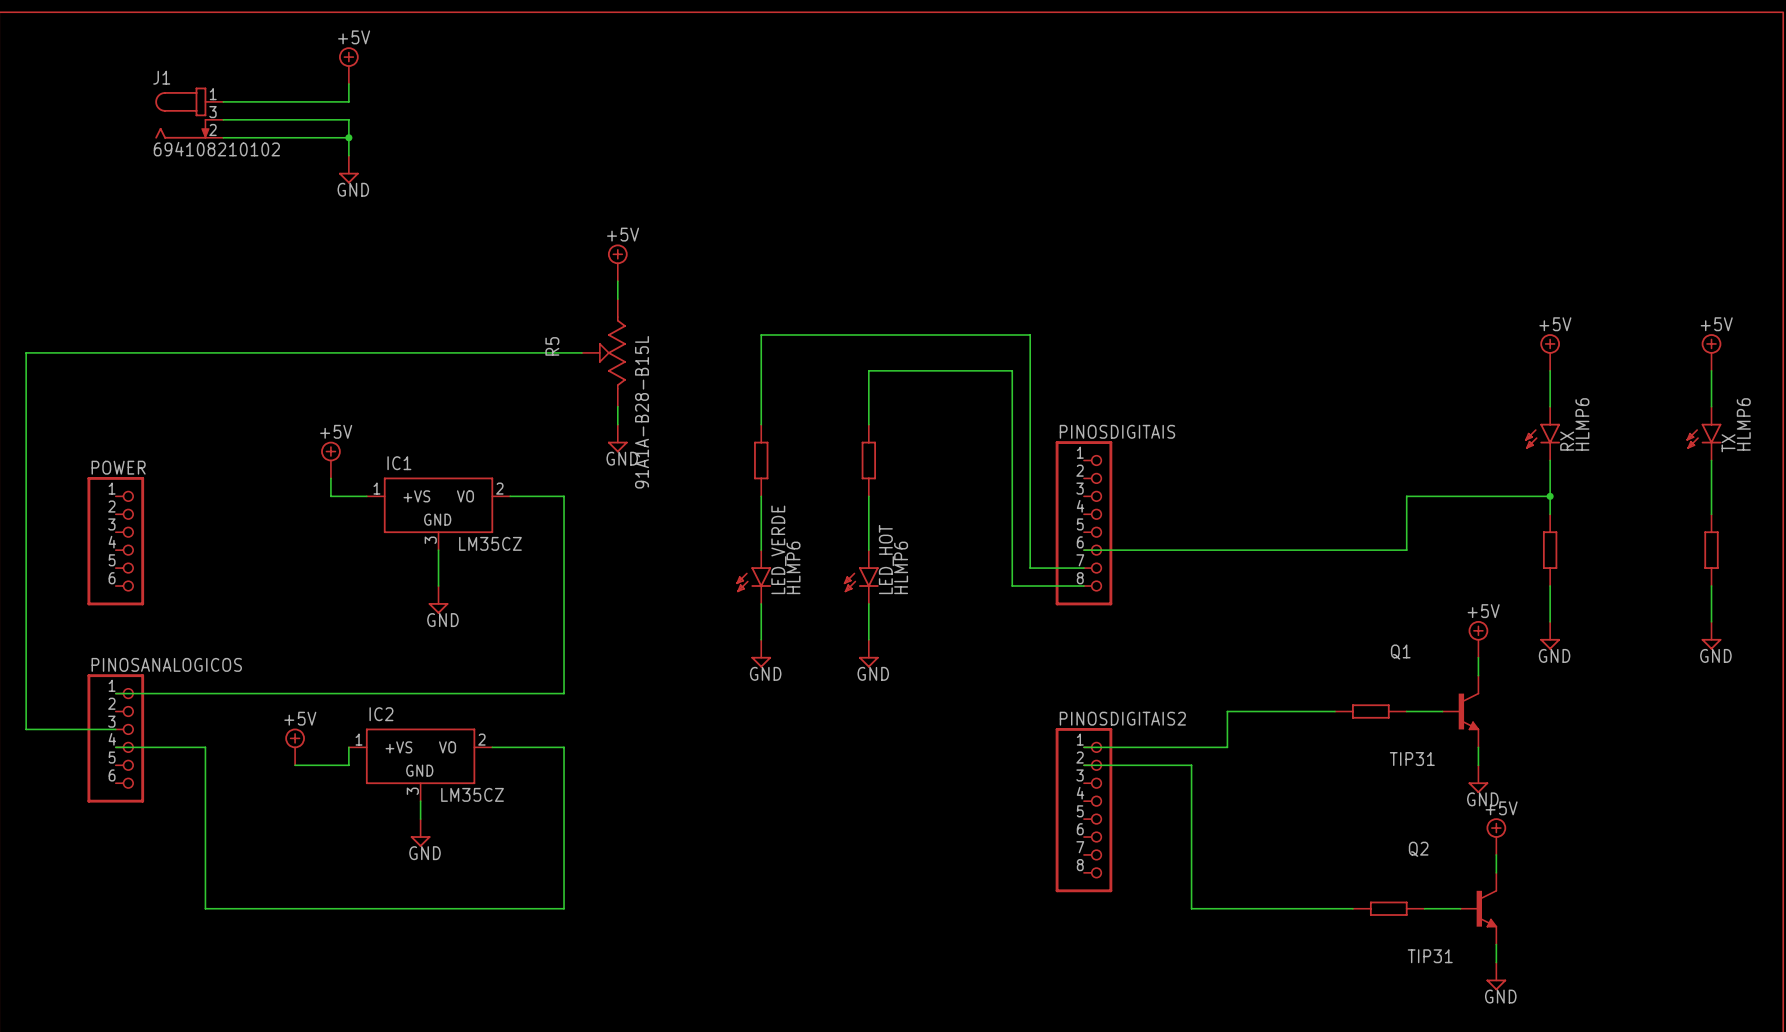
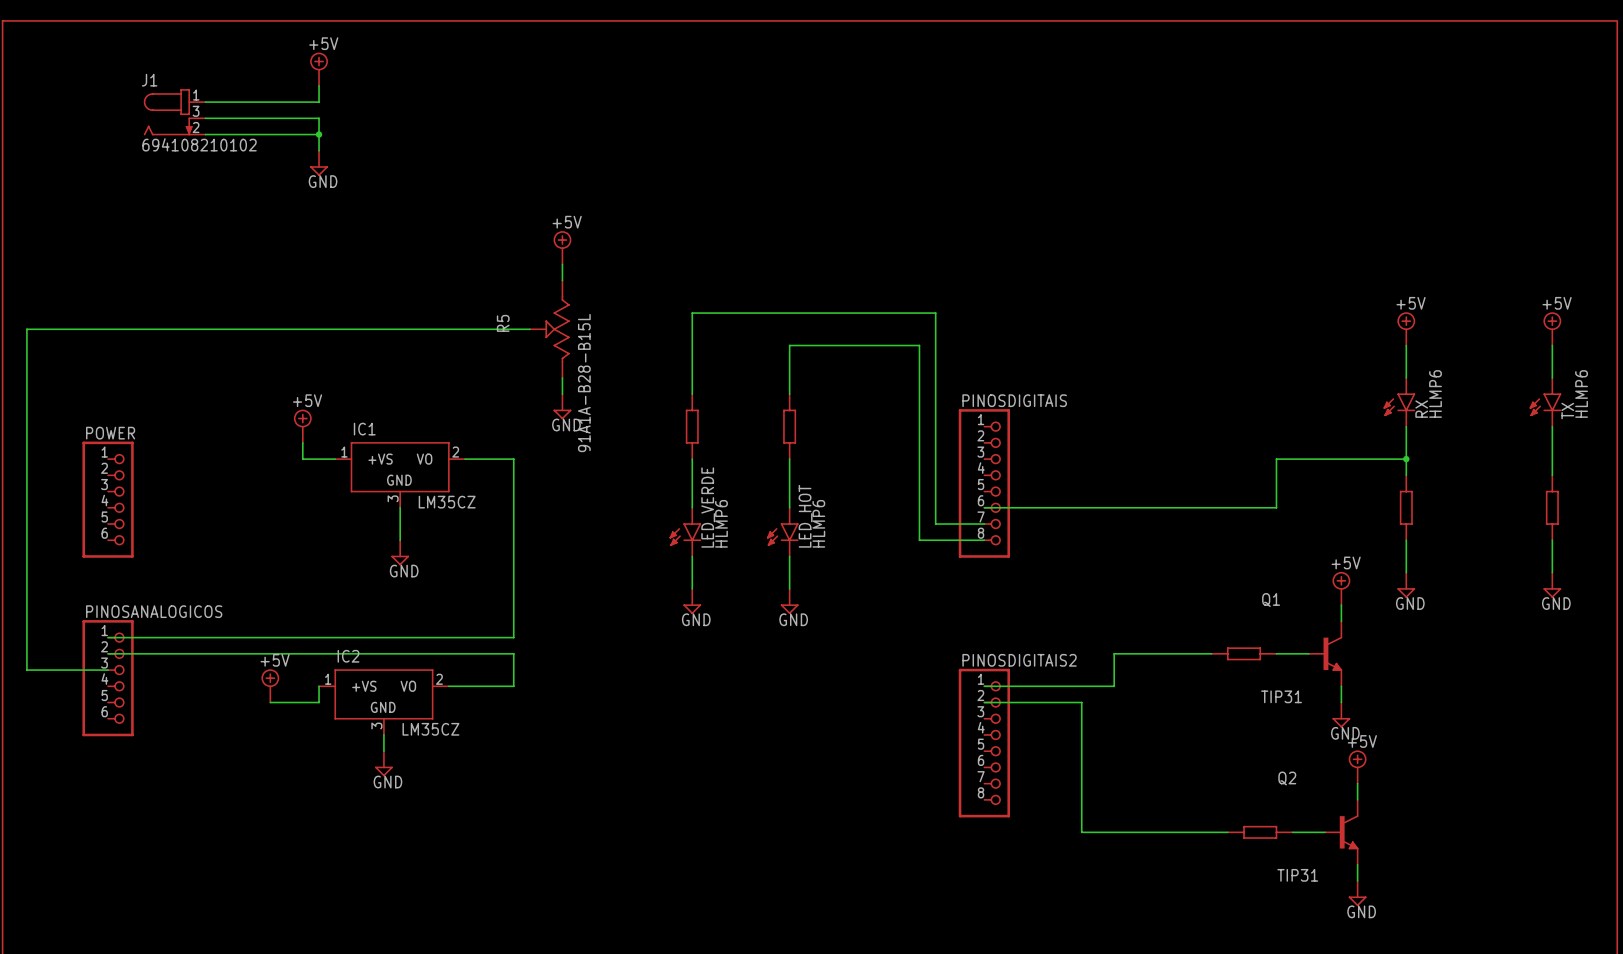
wire: (115, 747) (205, 747) (205, 908) (564, 908) (564, 747) -> (108, 653) (513, 653) (513, 686)

